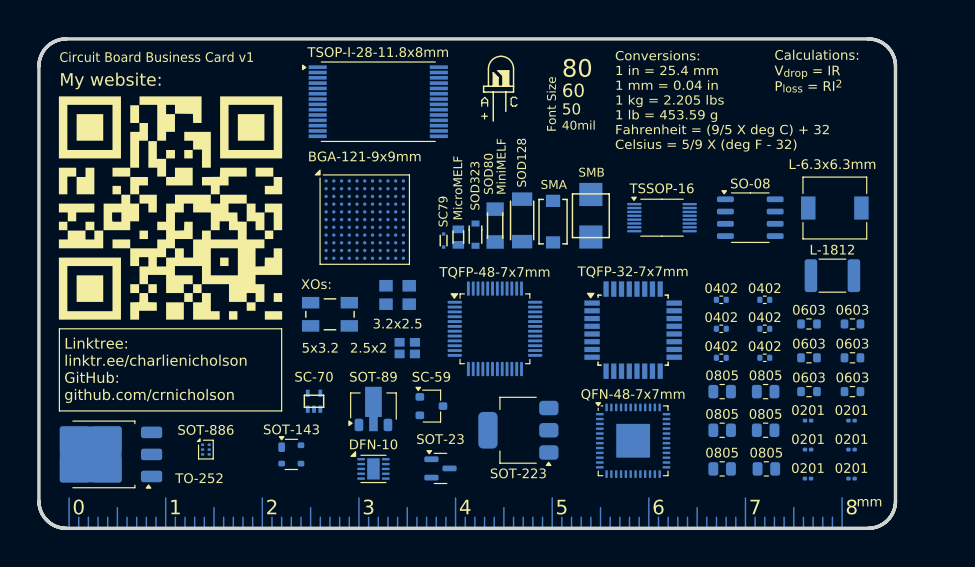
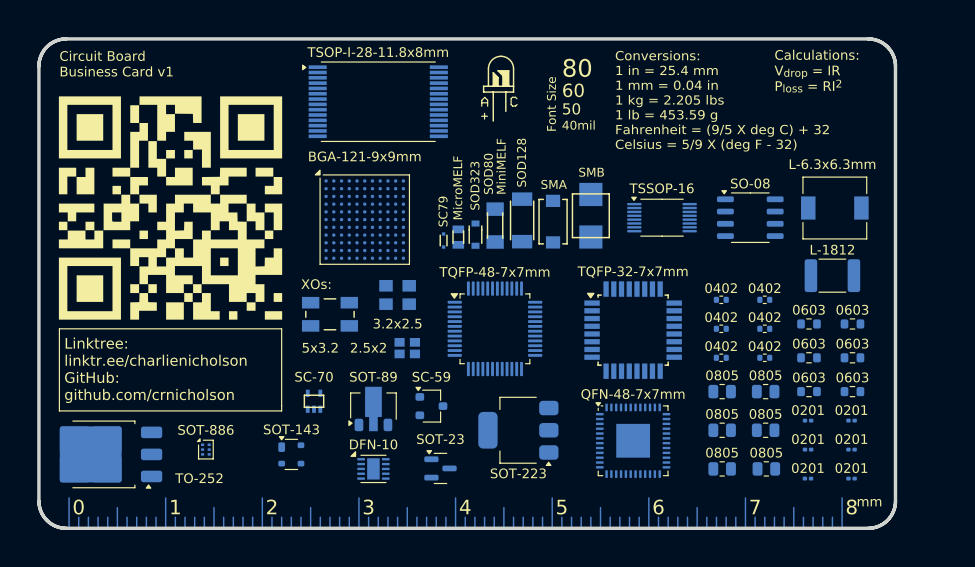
text: Circuit Board Business Card v1 (156, 56) -> Circuit Board (102, 55)
text: none -> Business Card v1 (116, 71)
text: My website: (110, 80) -> none

